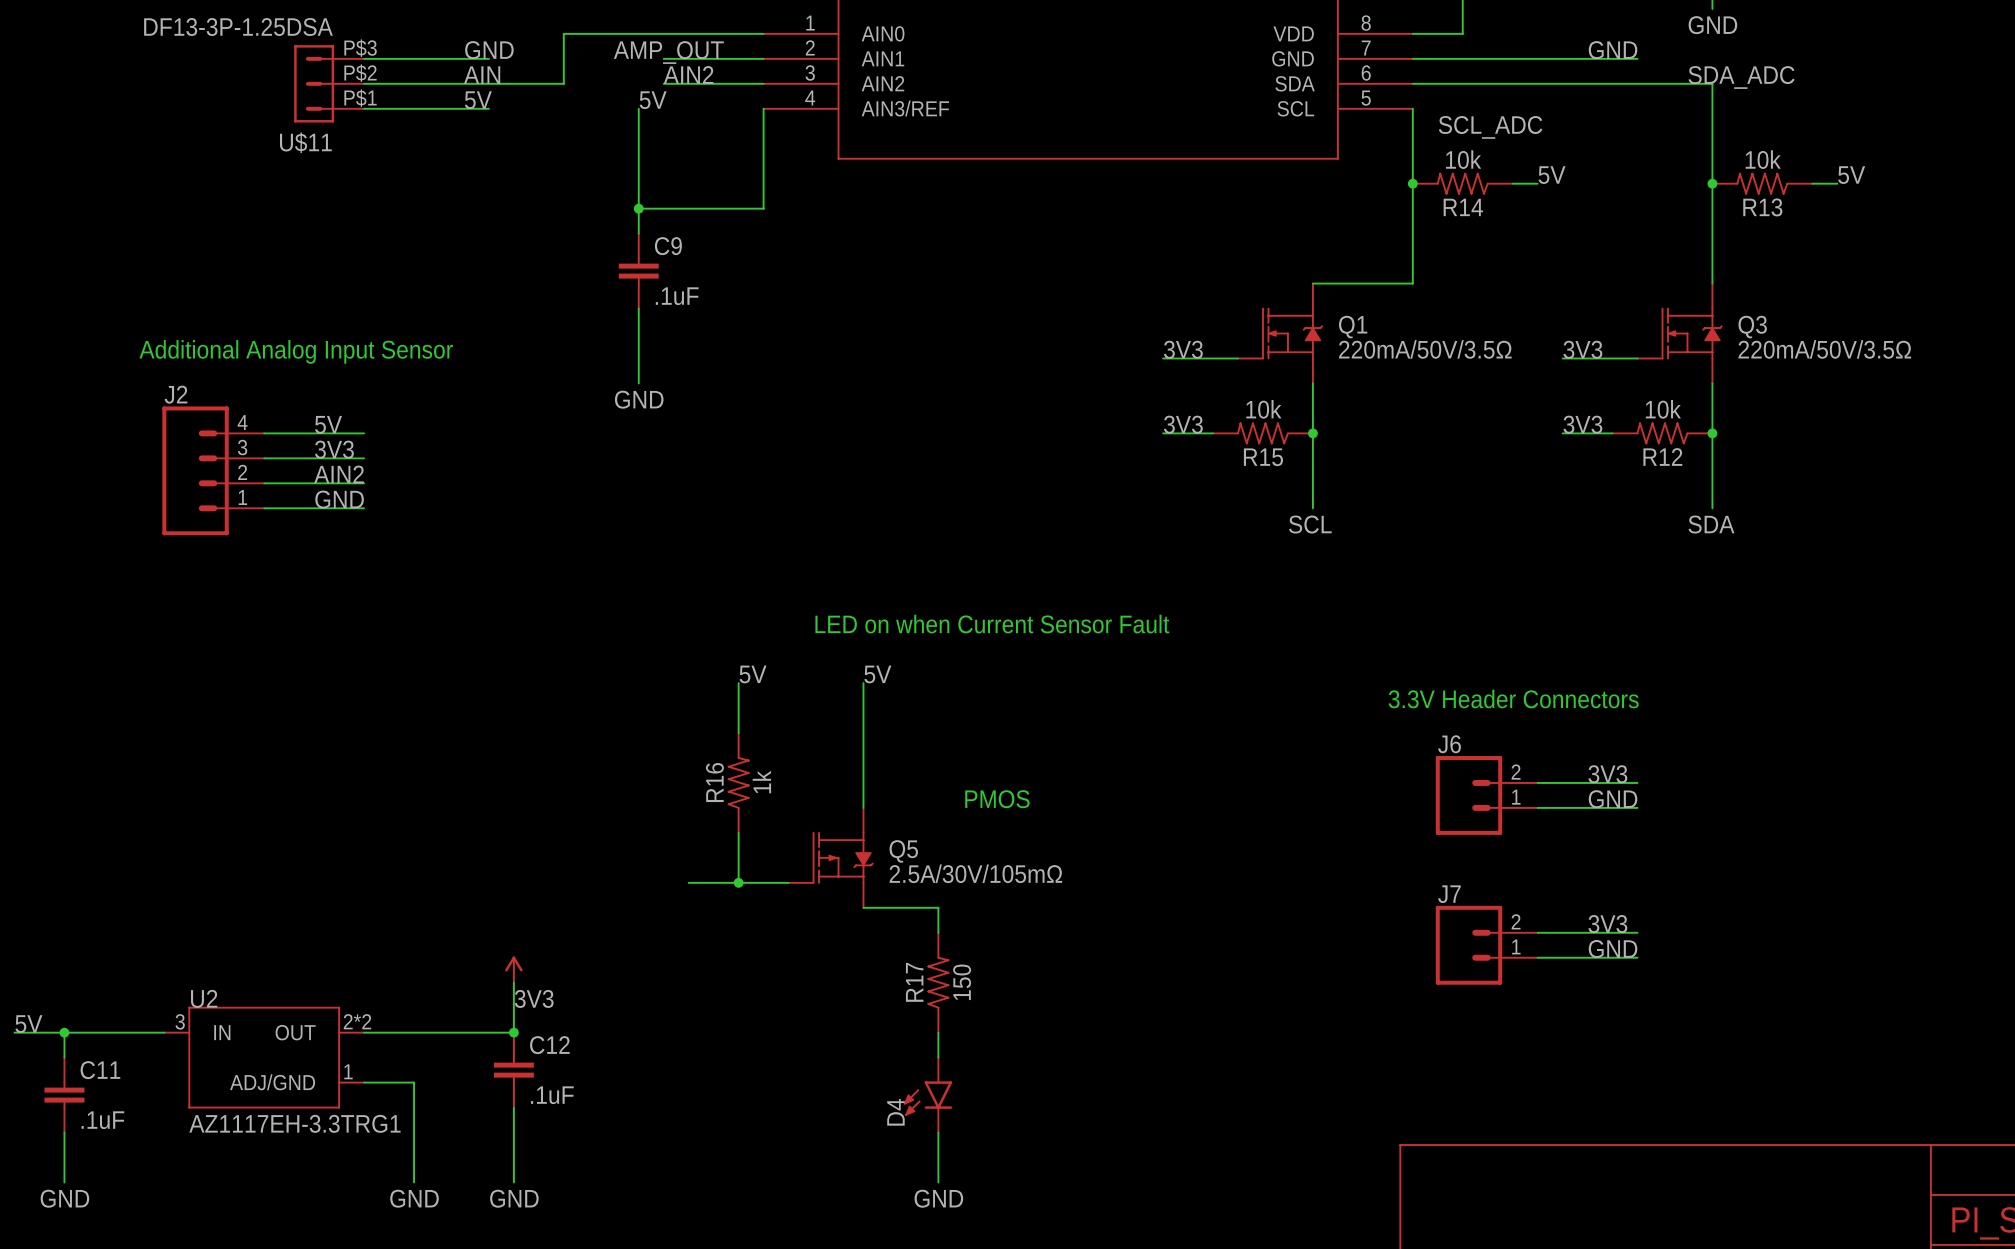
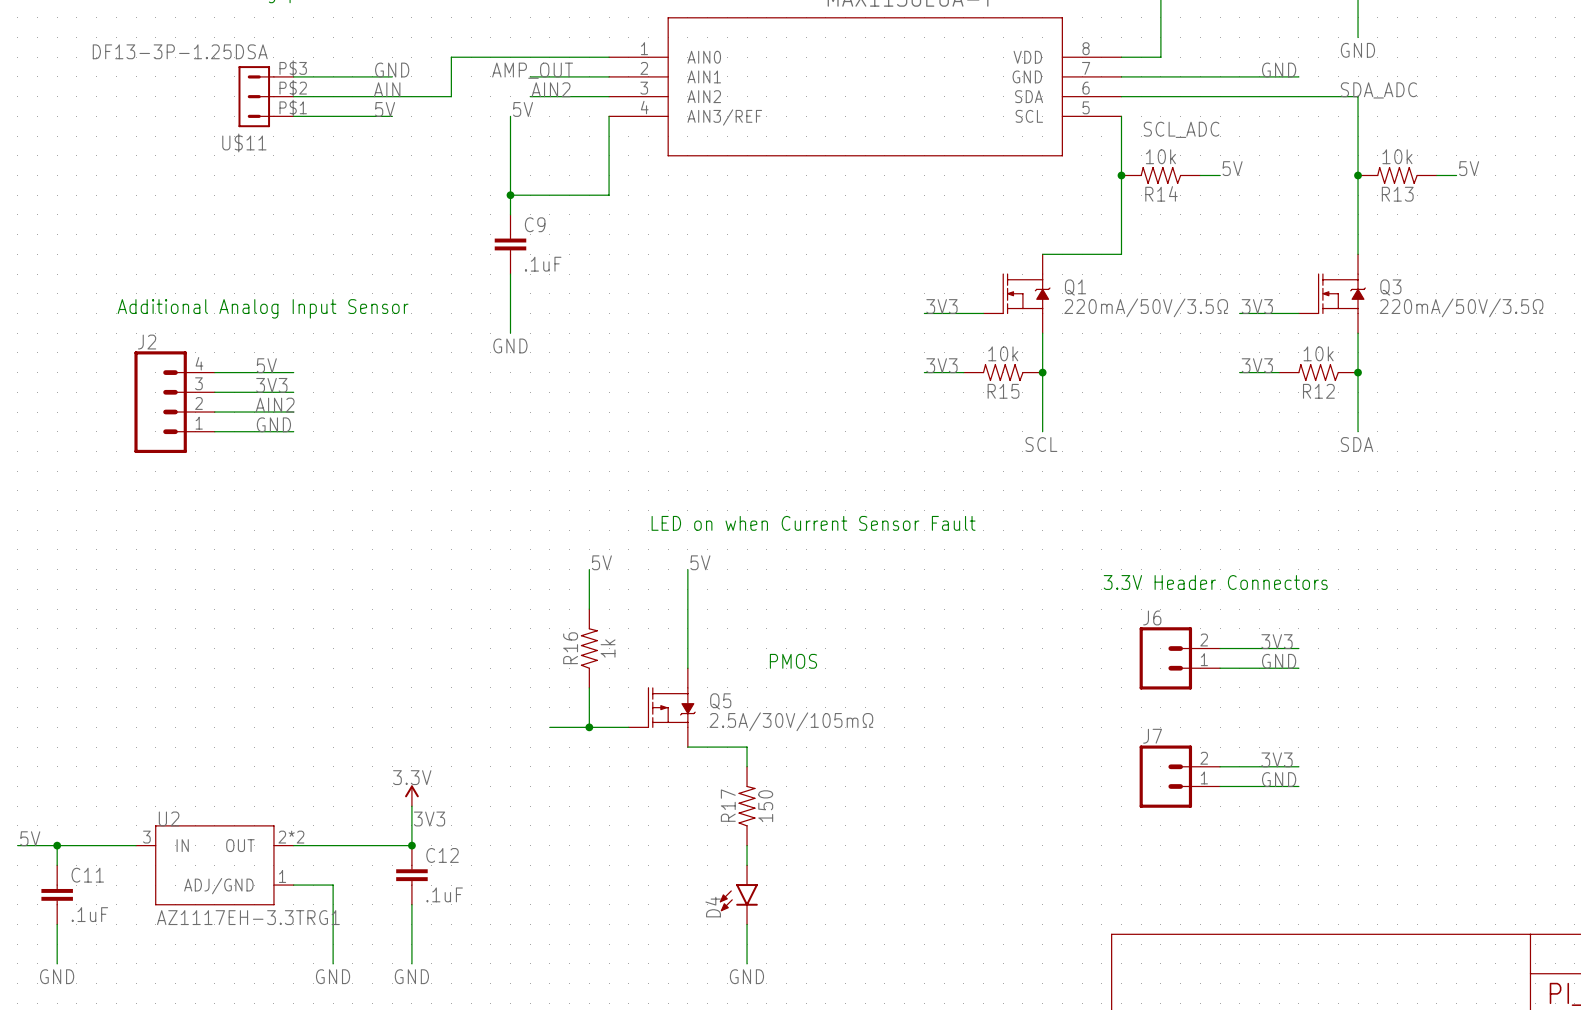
power symbol text: none -> 3.3V (412, 777)

